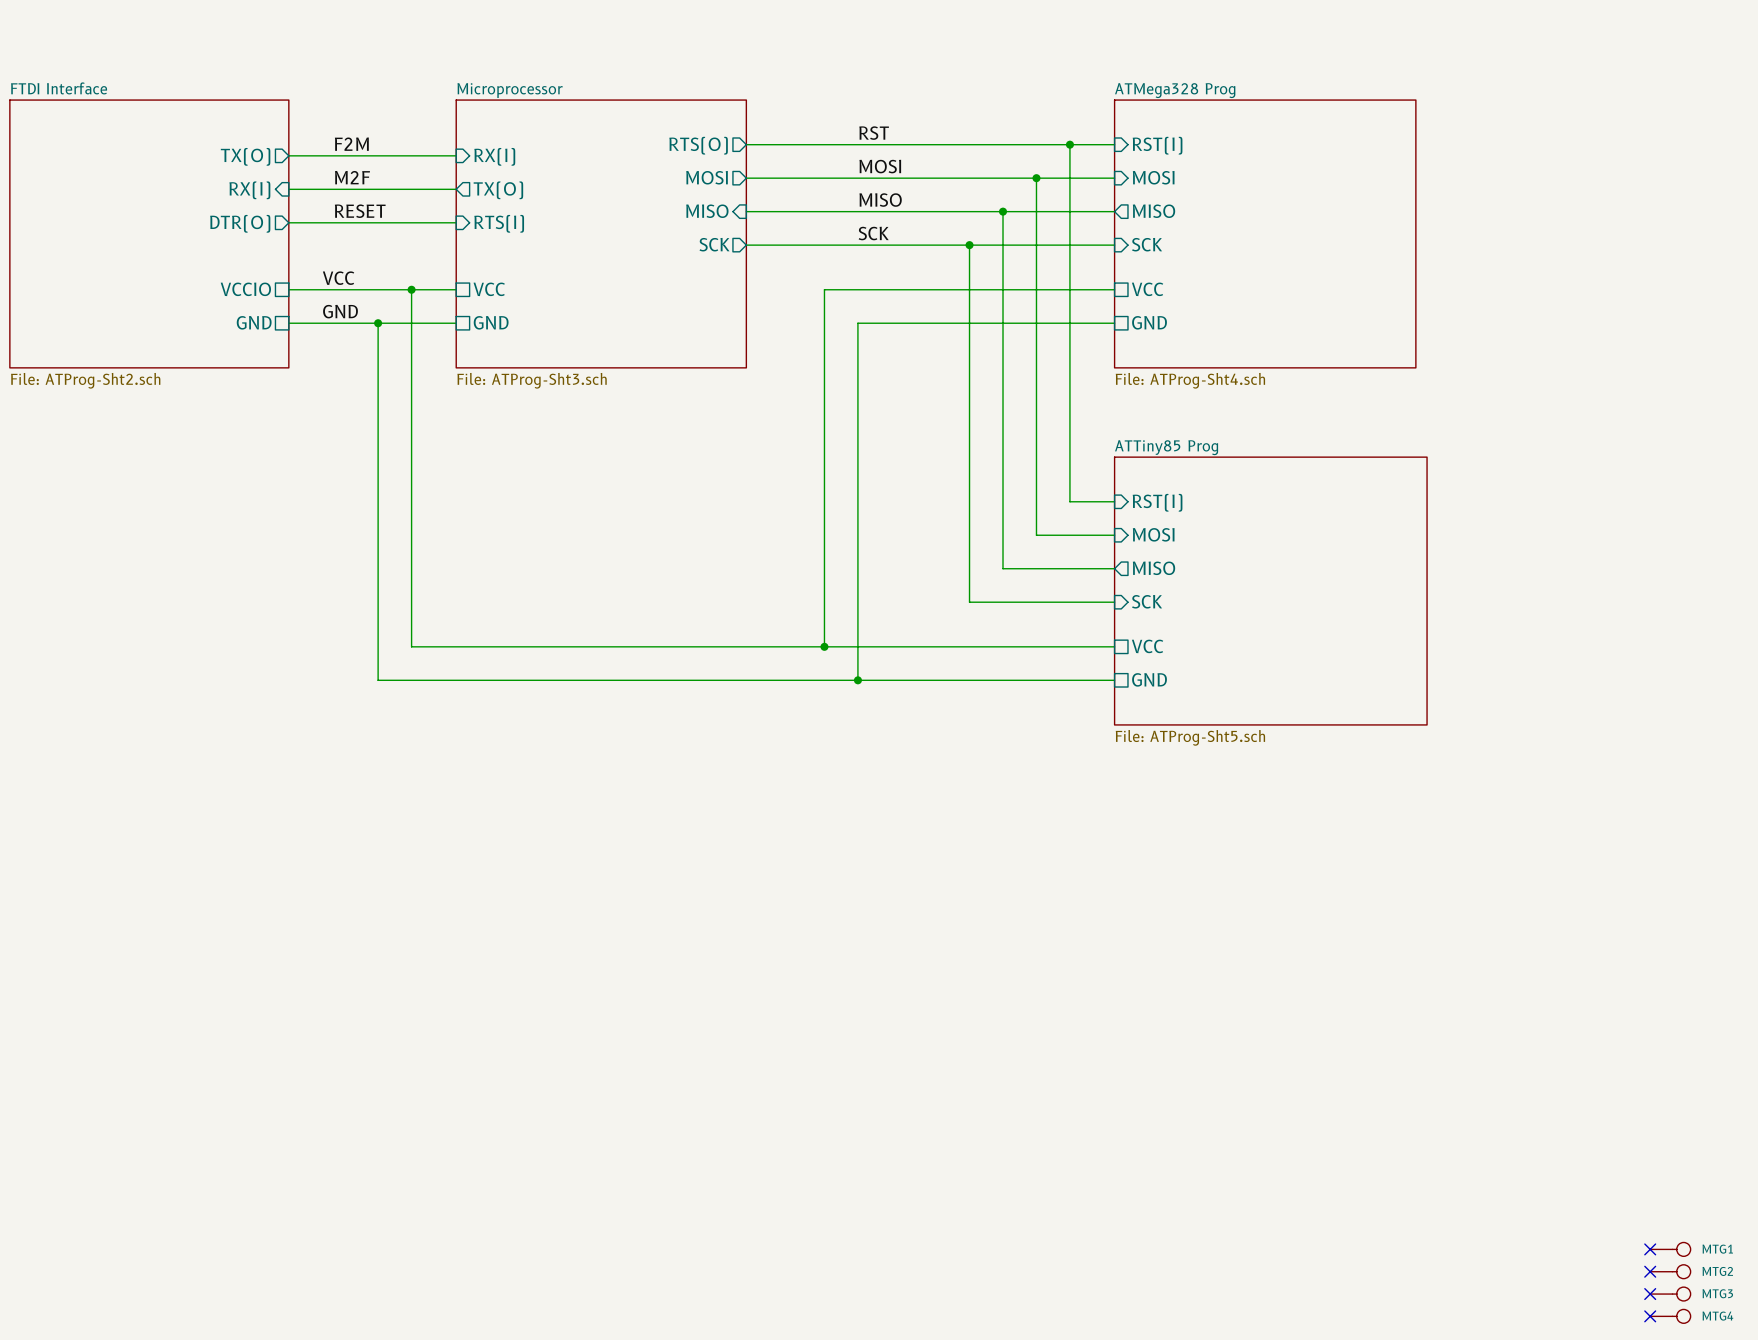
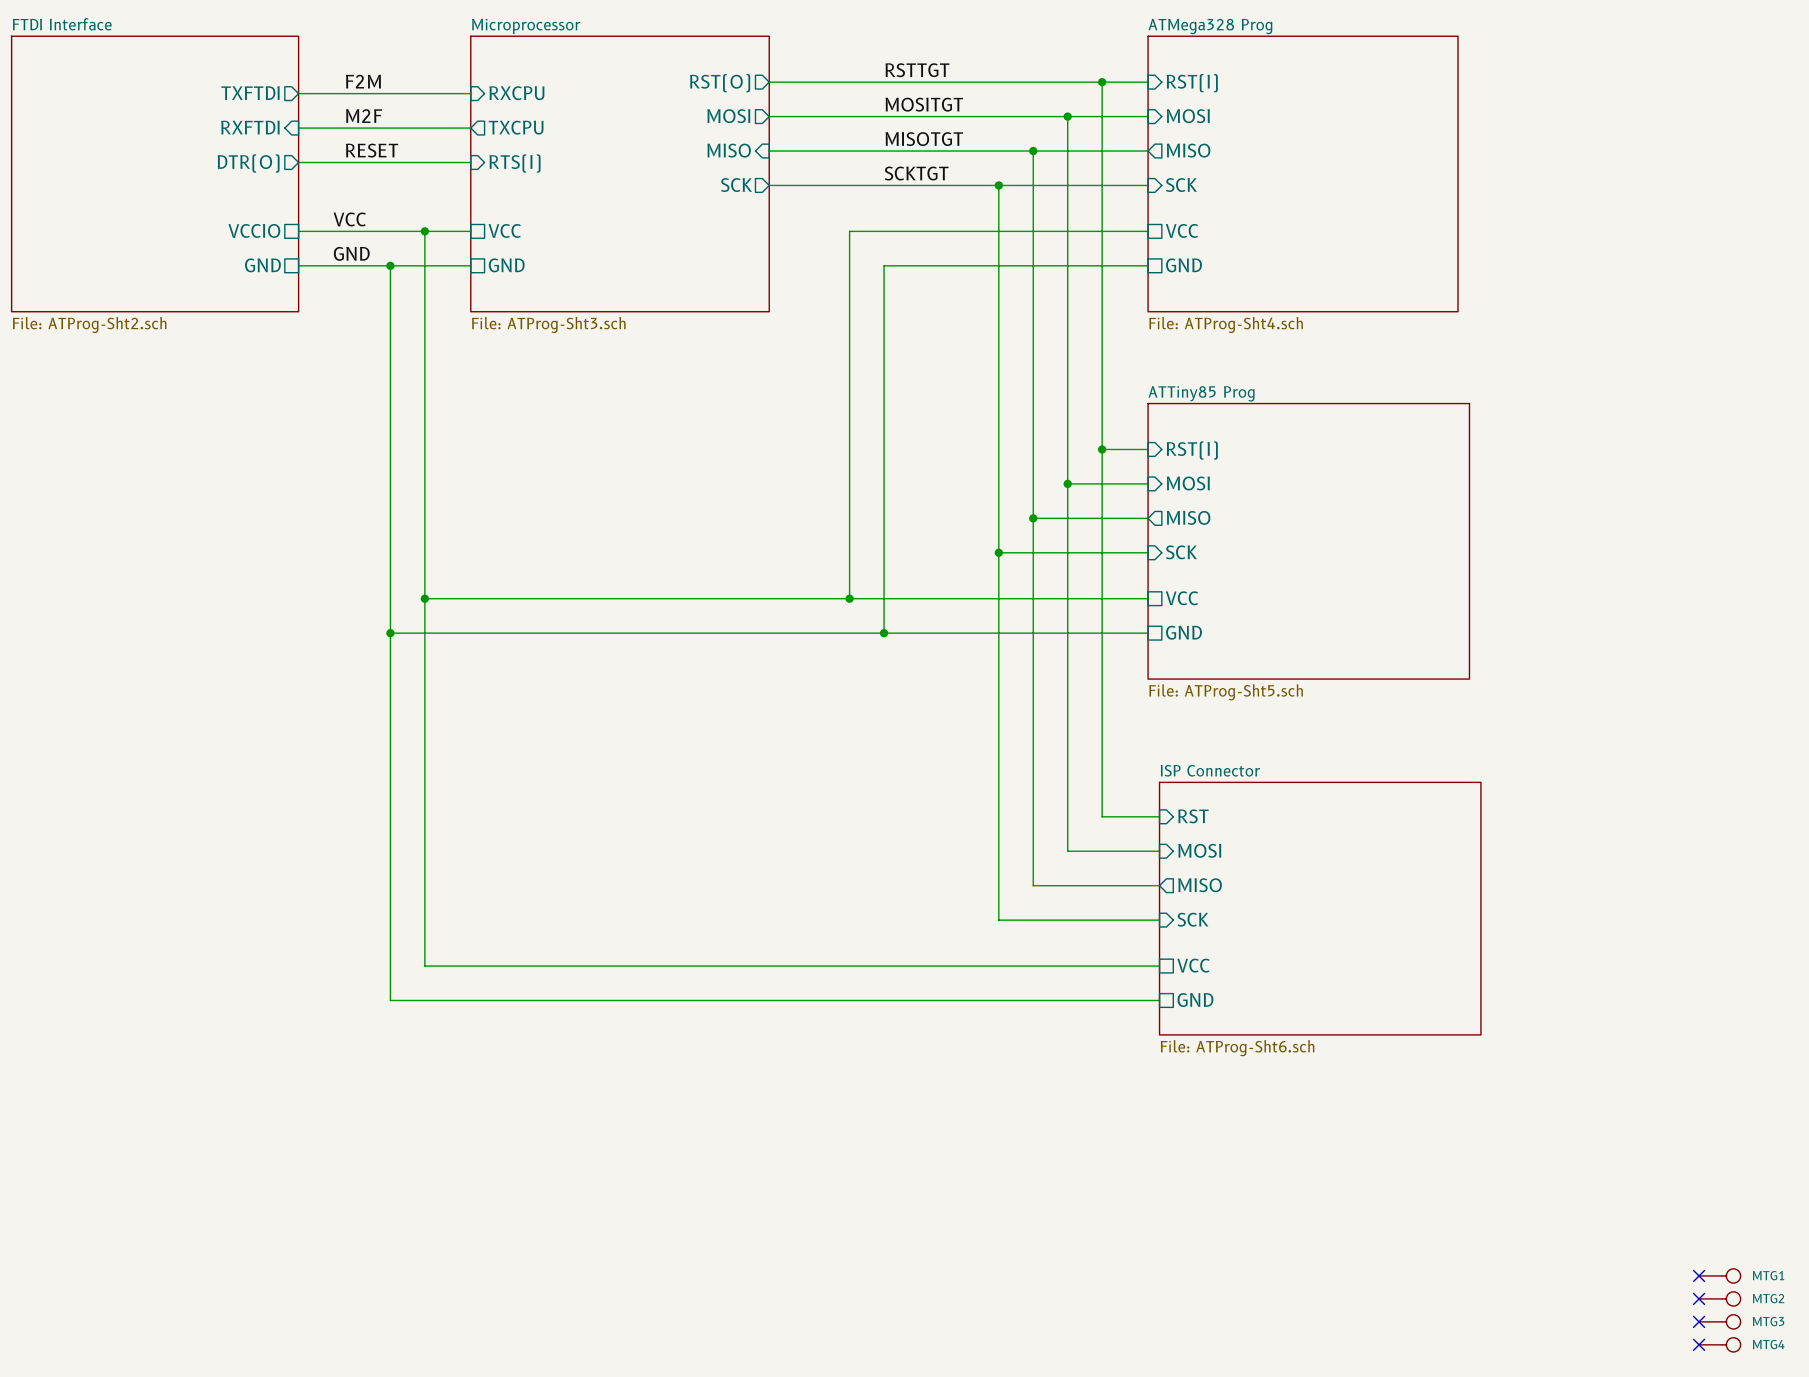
label: none -> RSTTGT (917, 70)
wire: none -> (1102, 82) (1102, 139)
junction: none -> (1102, 82)
sheet pin: none -> RST(O) (720, 83)
sheet pin: none -> TXFTDI (250, 93)
sheet pin: none -> RXCPU (516, 93)
label: none -> MOSITGT (924, 104)
wire: none -> (1067, 116) (1067, 173)
junction: none -> (1067, 116)
sheet pin: none -> RXFTDI (250, 127)
sheet pin: none -> TXCPU (516, 127)
label: RST (874, 133) -> none
label position: F2M (351, 144) -> F2M (363, 81)
wire: (746, 144) (1114, 144) -> (769, 82) (1148, 82)
label: none -> MISOTGT (924, 139)
junction: (1069, 144) -> none
sheet pin: RTS(O) (698, 145) -> none
sheet pin position: RST(I) (1157, 145) -> RST(I) (1192, 83)
wire: (288, 155) (456, 155) -> (298, 93) (470, 93)
wire: none -> (1033, 151) (1033, 208)
junction: none -> (1033, 151)
sheet pin: TX(O) (245, 156) -> none
sheet pin: RX(I) (494, 156) -> none
label: MOSI (880, 166) -> none
label position: M2F (352, 177) -> M2F (364, 116)
sheet pin position: MOSI (707, 177) -> MOSI (728, 116)
label: none -> SCKTGT (916, 173)
sheet pin position: MOSI (1153, 177) -> MOSI (1188, 116)
wire: (746, 178) (1114, 178) -> (769, 116) (1148, 116)
junction: (1036, 178) -> none
wire: (288, 189) (456, 189) -> (298, 128) (470, 128)
wire: none -> (998, 185) (998, 242)
junction: none -> (998, 185)
sheet pin: RX(I) (249, 190) -> none
sheet pin: TX(O) (498, 190) -> none
label: MISO (880, 200) -> none
label position: RESET (360, 211) -> RESET (372, 150)
sheet pin position: MISO (707, 211) -> MISO (729, 150)
wire: (746, 211) (1114, 211) -> (769, 151) (1148, 151)
junction: (1003, 211) -> none
sheet pin position: MISO (1154, 211) -> MISO (1188, 150)
wire: (288, 222) (456, 222) -> (298, 162) (470, 162)
sheet pin position: DTR(O) (240, 223) -> DTR(O) (248, 163)
sheet pin position: RTS(I) (499, 223) -> RTS(I) (514, 163)
sheet FTDI Interface position: (149, 233) -> (155, 173)
wire: none -> (424, 231) (424, 288)
junction: none -> (424, 231)
sheet Microprocessor position: (601, 233) -> (620, 173)
label: SCK (873, 233) -> none
sheet ATMega328 Prog position: (1265, 233) -> (1303, 173)
sheet pin position: SCK (714, 244) -> SCK (736, 185)
sheet pin position: SCK (1147, 244) -> SCK (1181, 185)
wire: (746, 245) (1114, 245) -> (769, 185) (1148, 185)
junction: (969, 245) -> none
wire: none -> (390, 265) (390, 323)
junction: none -> (390, 265)
label position: VCC (338, 278) -> VCC (349, 219)
sheet pin position: VCCIO (245, 289) -> VCCIO (254, 230)
wire: (288, 289) (456, 289) -> (298, 231) (470, 231)
junction: (411, 289) -> none
sheet pin position: VCC (489, 289) -> VCC (504, 230)
wire: (824, 289) (1114, 289) -> (849, 288) (849, 231) (1148, 231)
sheet pin position: VCC (1147, 289) -> VCC (1181, 230)
label position: GND (340, 311) -> GND (351, 253)
sheet pin position: GND (254, 322) -> GND (262, 265)
sheet pin position: GND (491, 322) -> GND (506, 265)
sheet pin position: GND (1149, 322) -> GND (1183, 265)
wire: (288, 323) (456, 323) -> (298, 265) (470, 265)
junction: (378, 323) -> none
wire: (857, 323) (1114, 323) -> (884, 323) (884, 265) (1148, 265)
wire: none -> (1102, 449) (1148, 449)
junction: none -> (1102, 449)
wire: none -> (1067, 483) (1148, 483)
junction: none -> (1067, 483)
wire: (1069, 501) (1114, 501) -> (1102, 506) (1102, 816) (1159, 816)
sheet pin position: RST(I) (1157, 502) -> RST(I) (1192, 450)
wire: none -> (1033, 518) (1148, 518)
junction: none -> (1033, 518)
sheet pin position: MOSI (1153, 534) -> MOSI (1188, 483)
wire: (1036, 535) (1114, 535) -> (1067, 541) (1067, 851) (1159, 851)
wire: none -> (998, 552) (1148, 552)
junction: none -> (998, 552)
wire: (1003, 568) (1114, 568) -> (1033, 575) (1033, 885) (1159, 885)
sheet pin position: MISO (1154, 568) -> MISO (1188, 517)
wire: none -> (424, 598) (1148, 598)
junction: none -> (424, 598)
wire: (824, 591) (824, 646) -> none
junction: none -> (849, 598)
sheet ATTiny85 Prog position: (1270, 591) -> (1308, 541)
sheet pin position: SCK (1147, 601) -> SCK (1181, 552)
wire: (969, 602) (1114, 602) -> (998, 610) (998, 920) (1159, 920)
wire: none -> (390, 633) (1148, 633)
junction: none -> (390, 633)
wire: (857, 624) (857, 680) -> none
junction: none -> (884, 633)
wire: (411, 646) (1114, 646) -> (424, 656) (424, 966) (1159, 966)
junction: (824, 646) -> none
sheet pin position: VCC (1147, 646) -> VCC (1181, 598)
sheet pin position: GND (1149, 679) -> GND (1183, 632)
wire: (378, 680) (1114, 680) -> (390, 690) (390, 1000) (1159, 1000)
junction: (857, 680) -> none
sheet pin: none -> RST (1193, 816)
sheet pin: none -> MOSI (1199, 850)
sheet pin: none -> MISO (1200, 885)
sheet ISP Connector: none -> File: ATProg-Sht6.sch (1320, 908)
sheet pin: none -> SCK (1192, 919)
sheet pin: none -> VCC (1193, 965)
sheet pin: none -> GND (1195, 1000)

